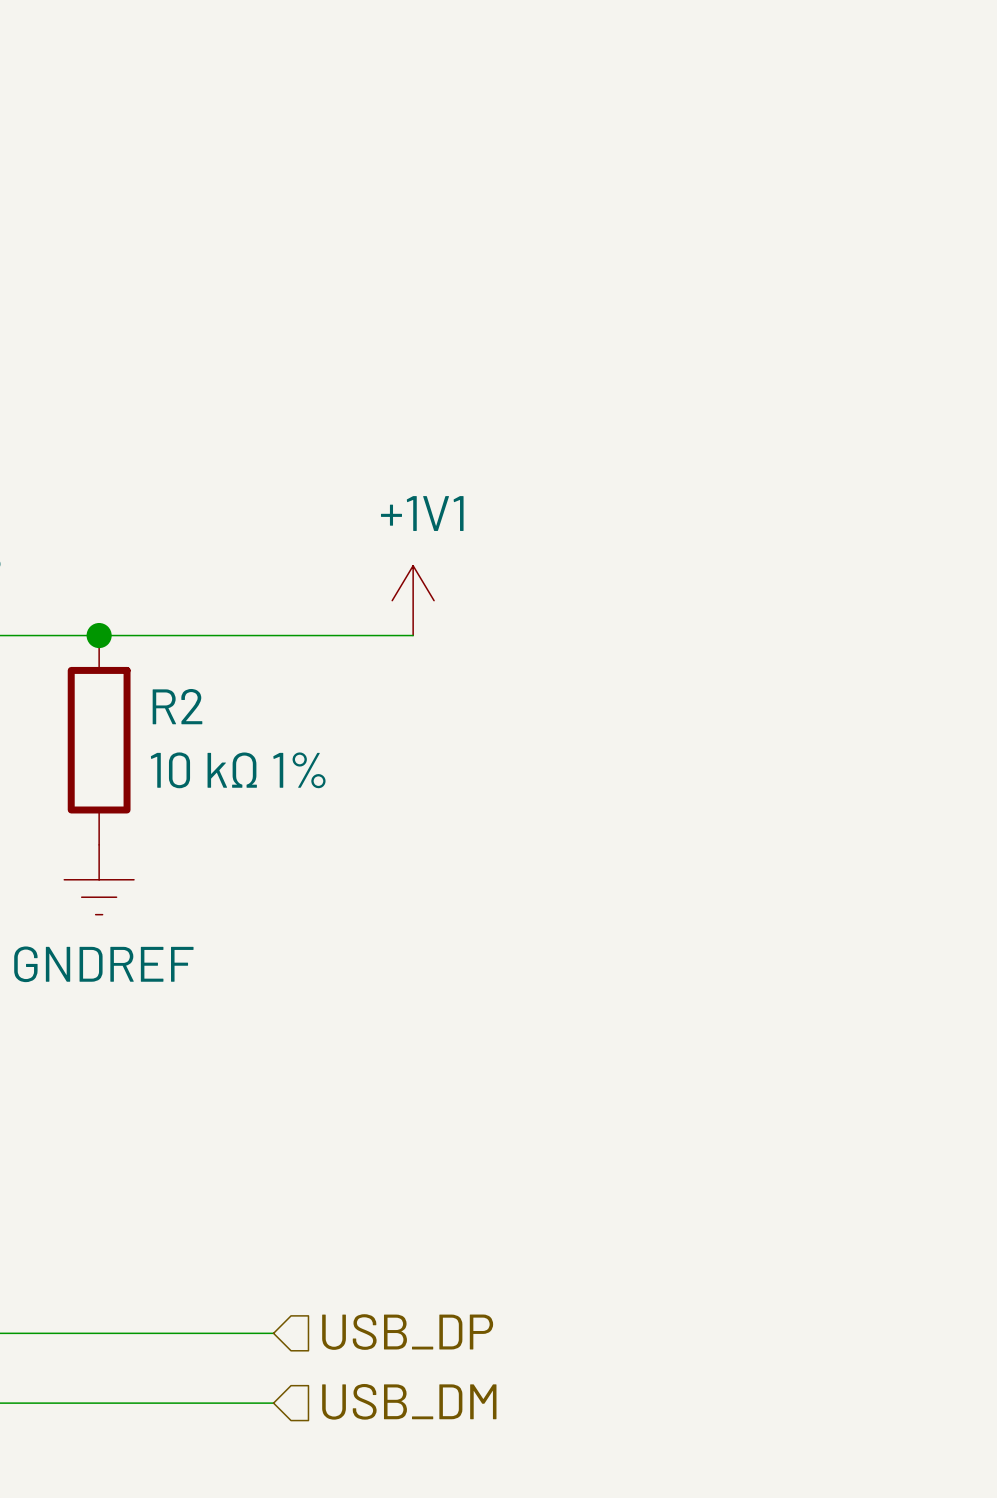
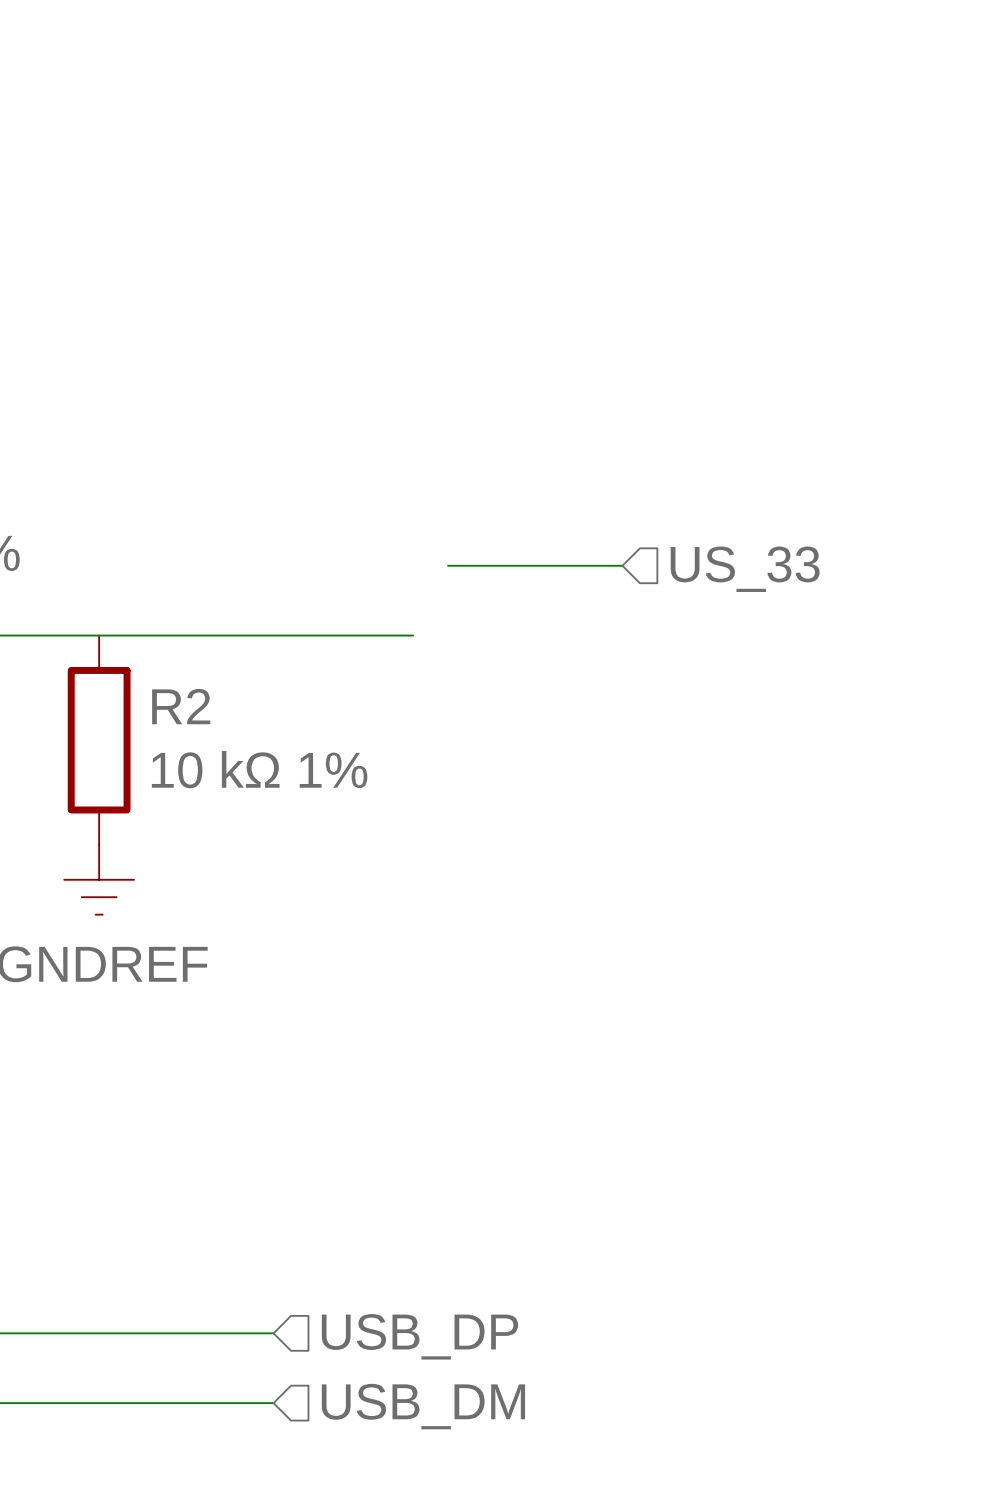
hierarchical label: none -> US_33 (745, 569)
wire: none -> (448, 565) (622, 565)
power symbol: +1V1 (413, 600) -> none
junction: (99, 635) -> none

